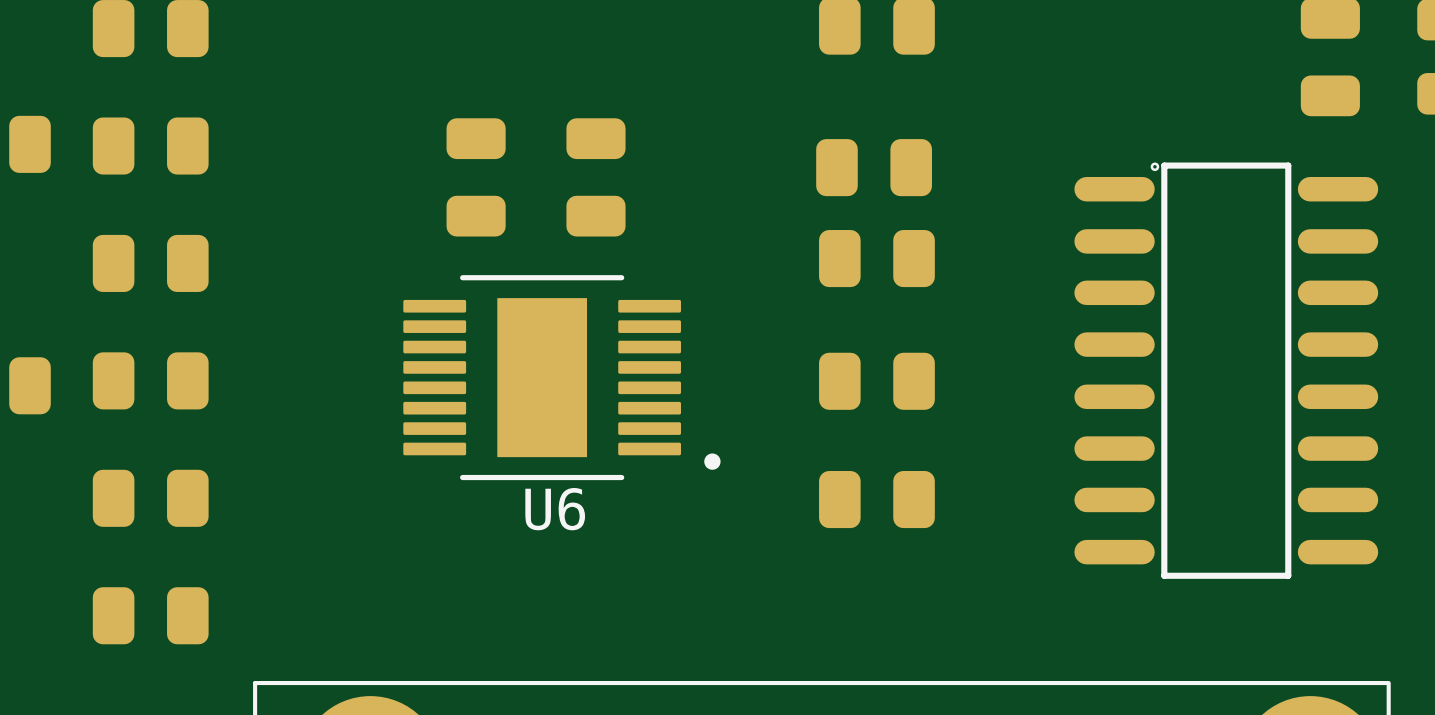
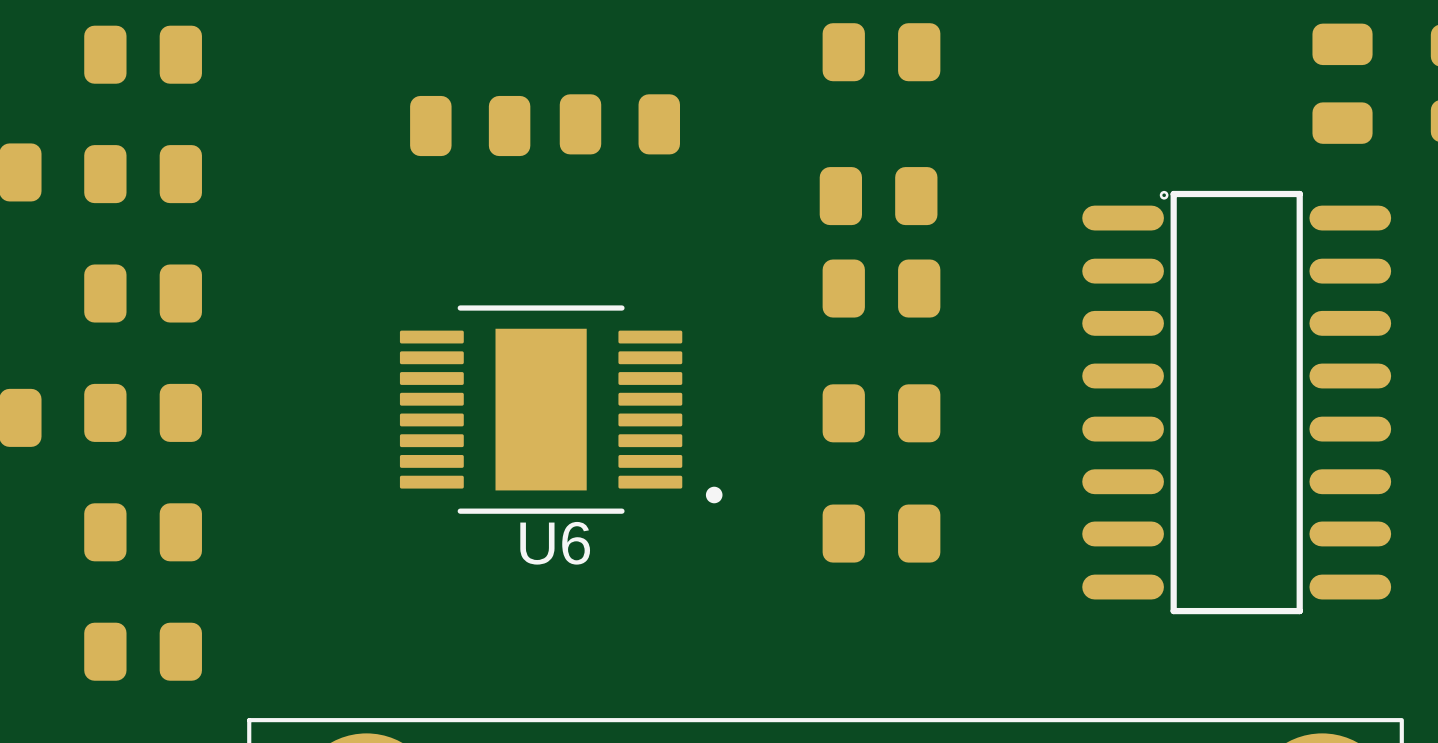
part: none -> (619, 124)
part: none -> (470, 126)
part: (476, 177) -> none
part: (595, 177) -> none

